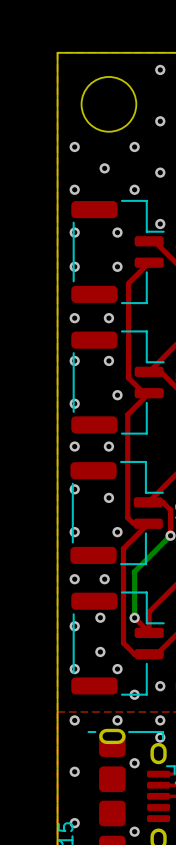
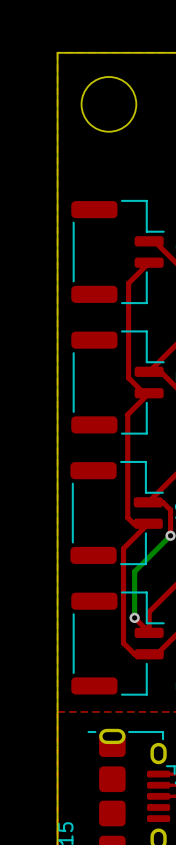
via: (160, 69) -> none
via: (160, 121) -> none
via: (74, 146) -> none
via: (134, 146) -> none
via: (104, 168) -> none
via: (160, 172) -> none
via: (74, 189) -> none
via: (134, 189) -> none
via: (160, 224) -> none
via: (74, 232) -> none
via: (117, 232) -> none
via: (74, 266) -> none
via: (117, 266) -> none
via: (74, 318) -> none
via: (108, 318) -> none
via: (74, 360) -> none
via: (108, 360) -> none
via: (117, 395) -> none
via: (74, 403) -> none
via: (74, 446) -> none
via: (108, 446) -> none
via: (74, 489) -> none
via: (108, 497) -> none
via: (74, 532) -> none
via: (117, 532) -> none
via: (74, 579) -> none
via: (104, 579) -> none
via: (100, 617) -> none
via: (74, 626) -> none
via: (100, 651) -> none
via: (74, 669) -> none
via: (117, 669) -> none
via: (160, 686) -> none
via: (134, 694) -> none
via: (74, 720) -> none
via: (117, 720) -> none
via: (160, 720) -> none
via: (160, 737) -> none
via: (134, 763) -> none
via: (74, 771) -> none
via: (74, 823) -> none
via: (134, 831) -> none

